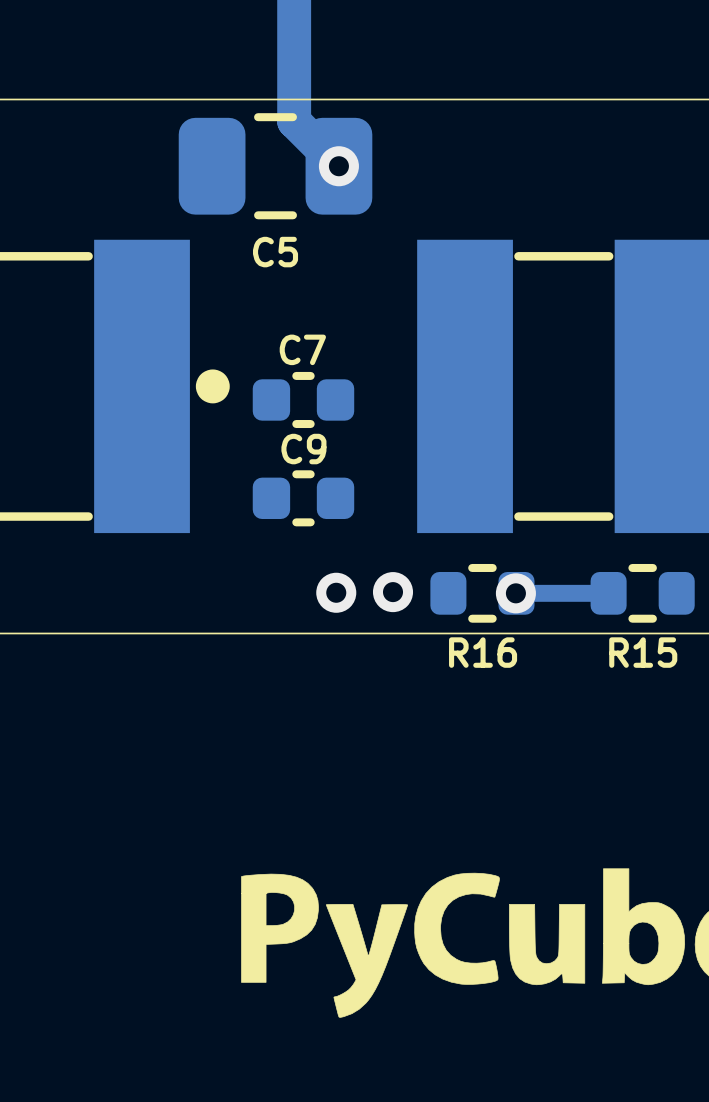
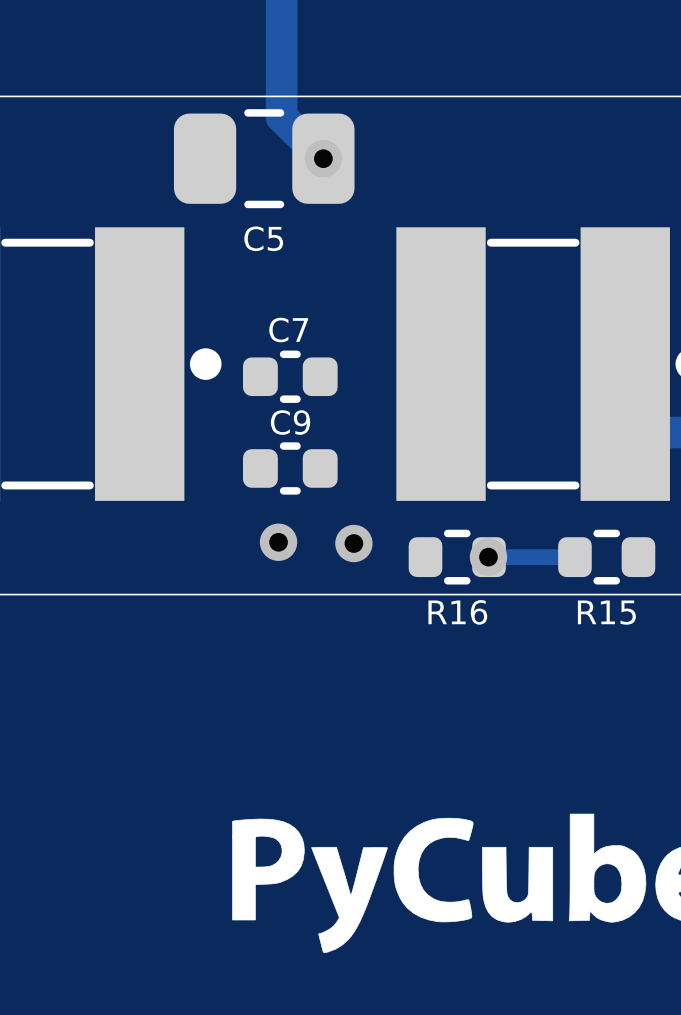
via: none -> (278, 542)
via: none -> (353, 543)
via: (336, 592) -> none
via: (393, 592) -> none

